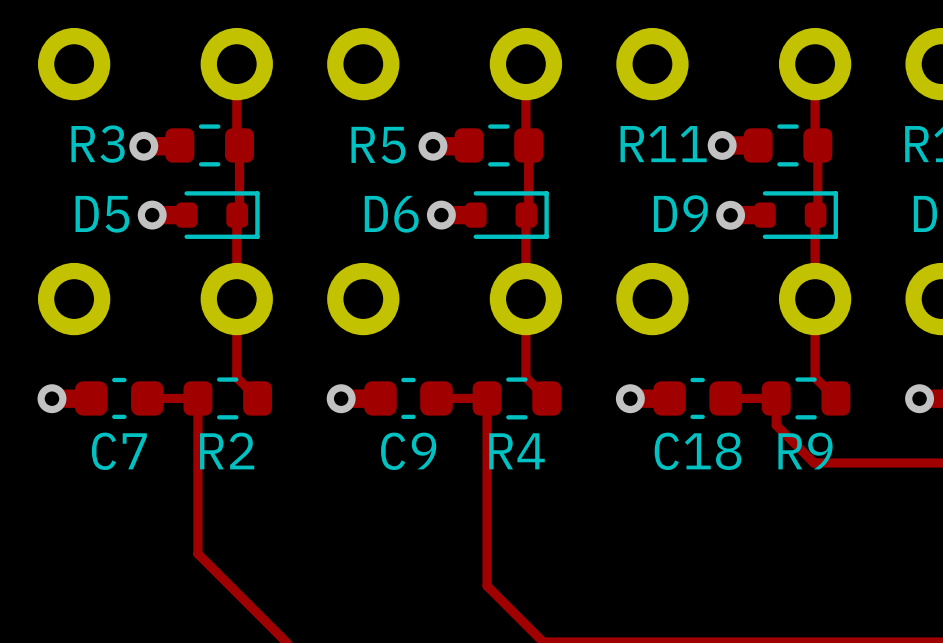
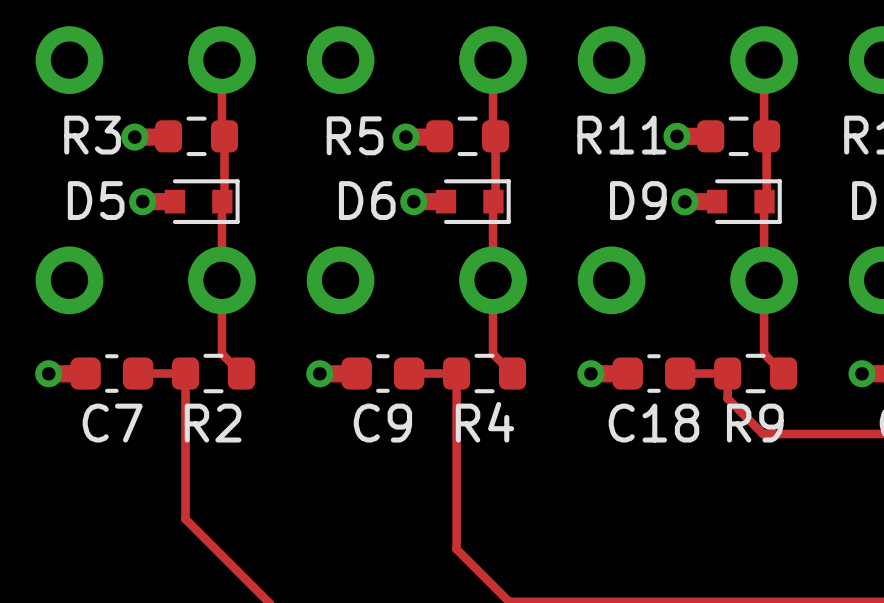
D5 footprint: [175, 191, 260, 239] -> [164, 179, 240, 224]
D6 footprint: [464, 191, 549, 239] -> [435, 179, 511, 224]
D9 footprint: [754, 191, 838, 239] -> [706, 179, 782, 224]

